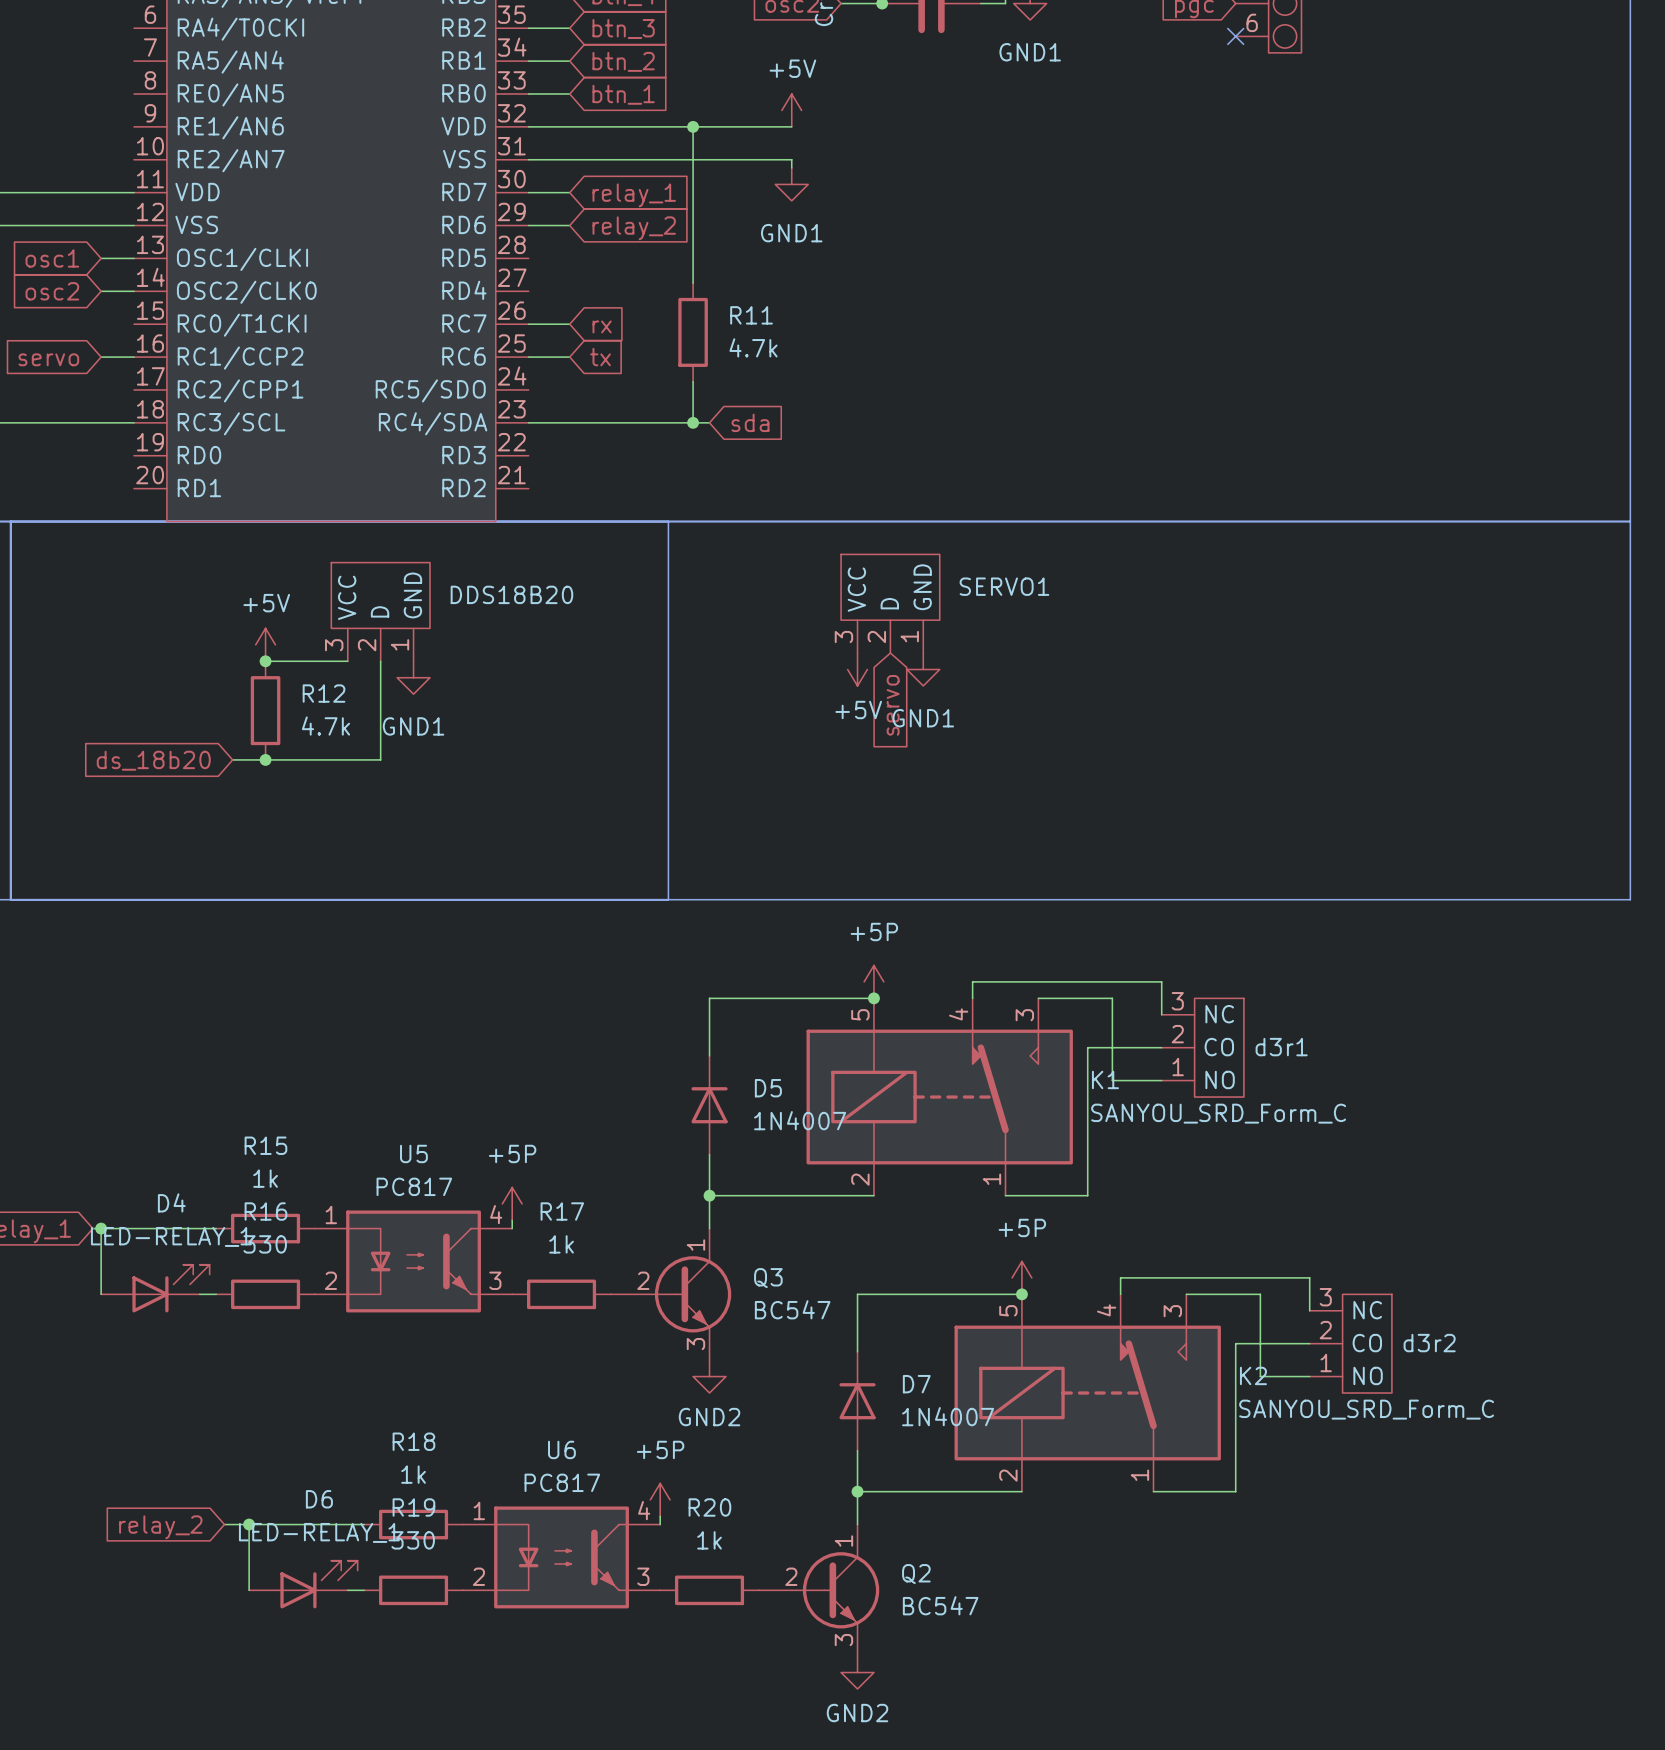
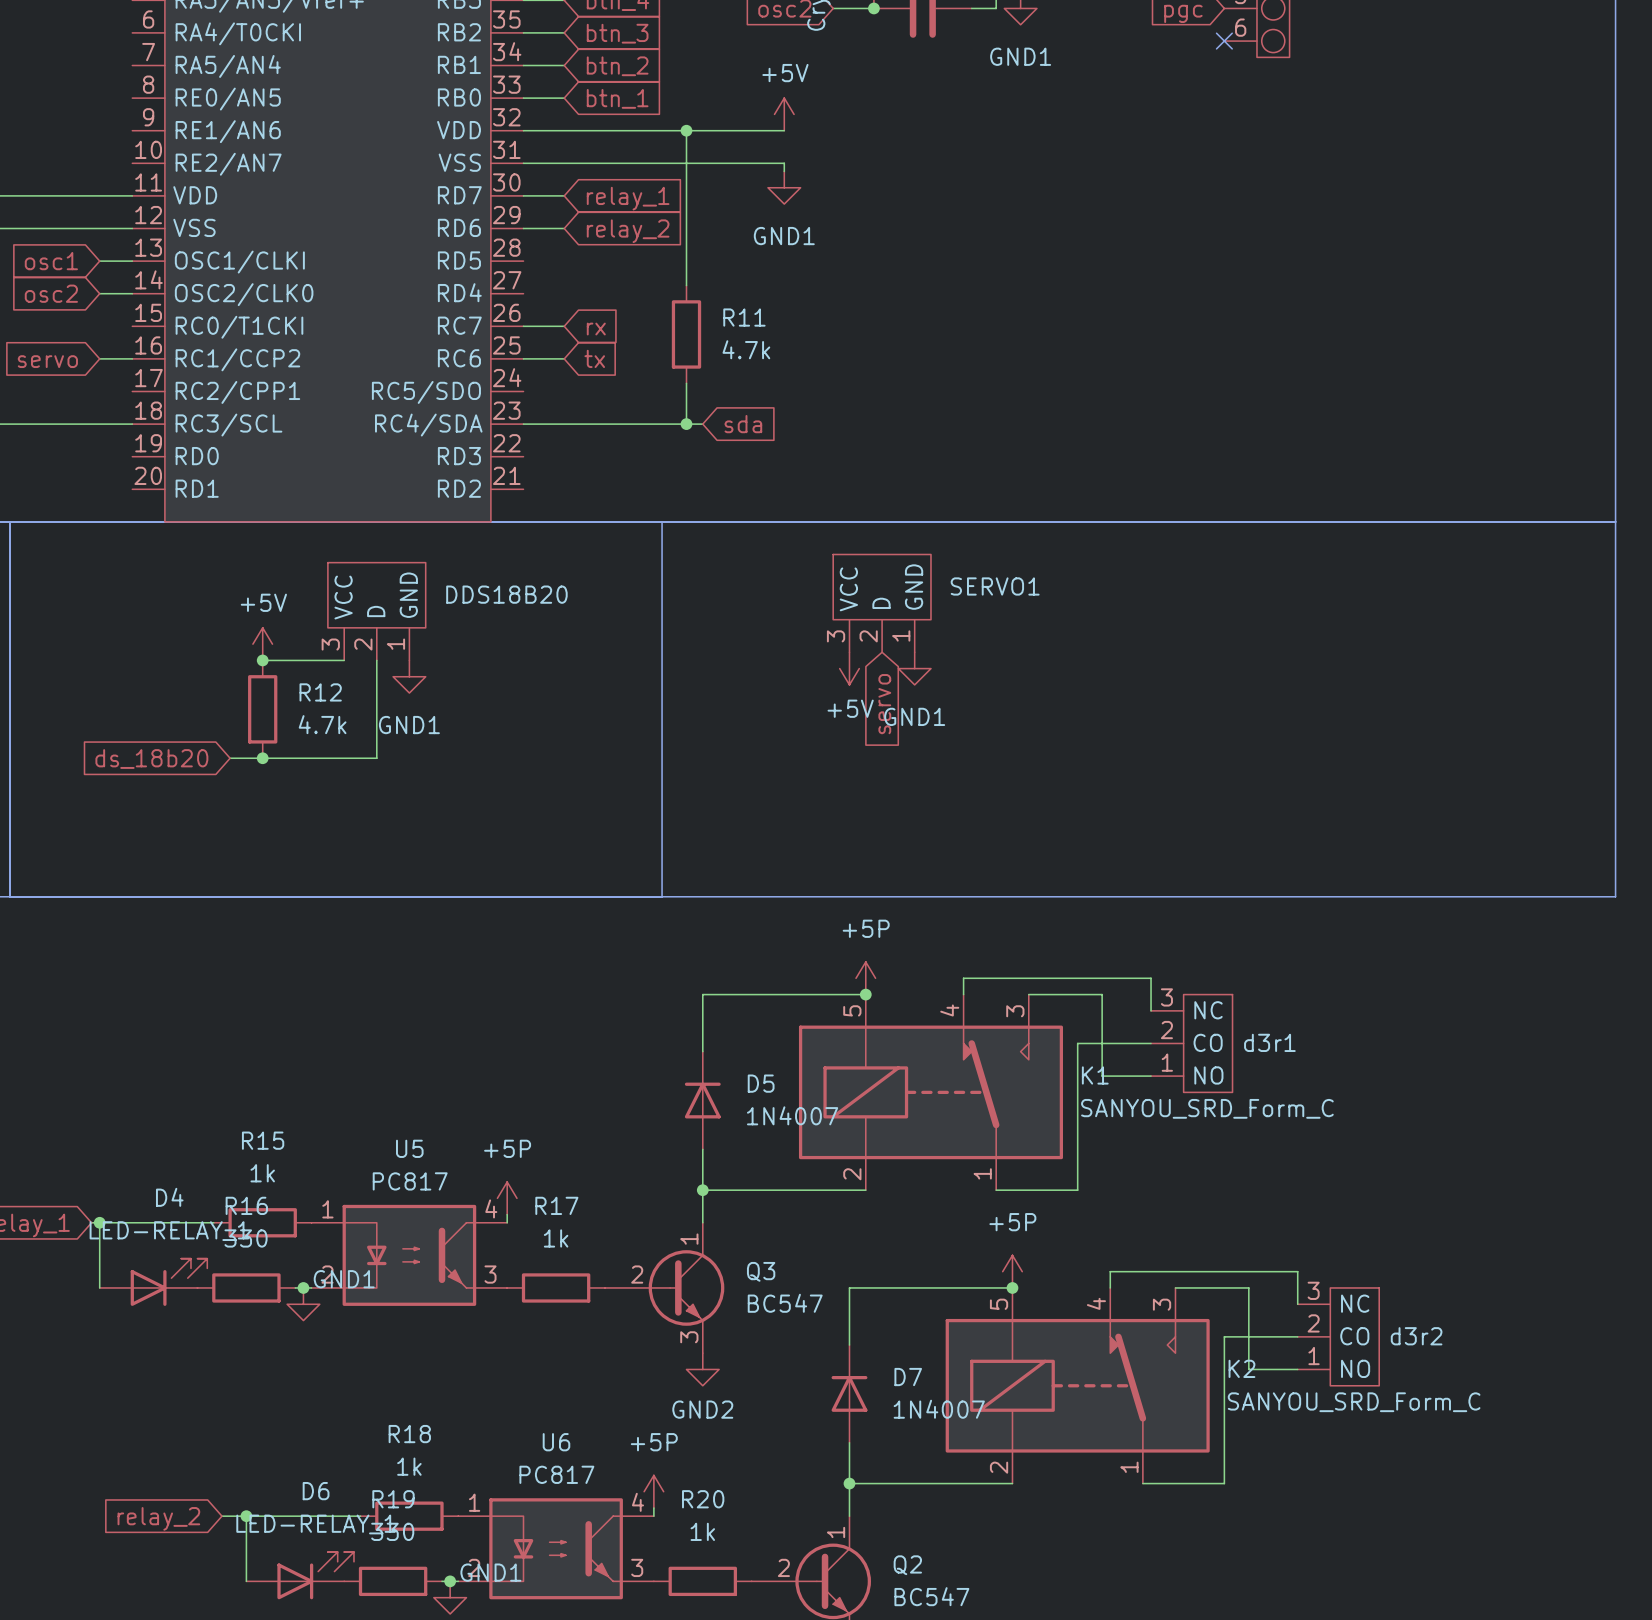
R16 position: (265, 1294) -> (246, 1287)
junction: none -> (303, 1287)
power symbol: none -> GND1 (303, 1304)
R19 position: (413, 1590) -> (393, 1581)
junction: none -> (450, 1581)
power symbol: none -> GND1 (450, 1597)

